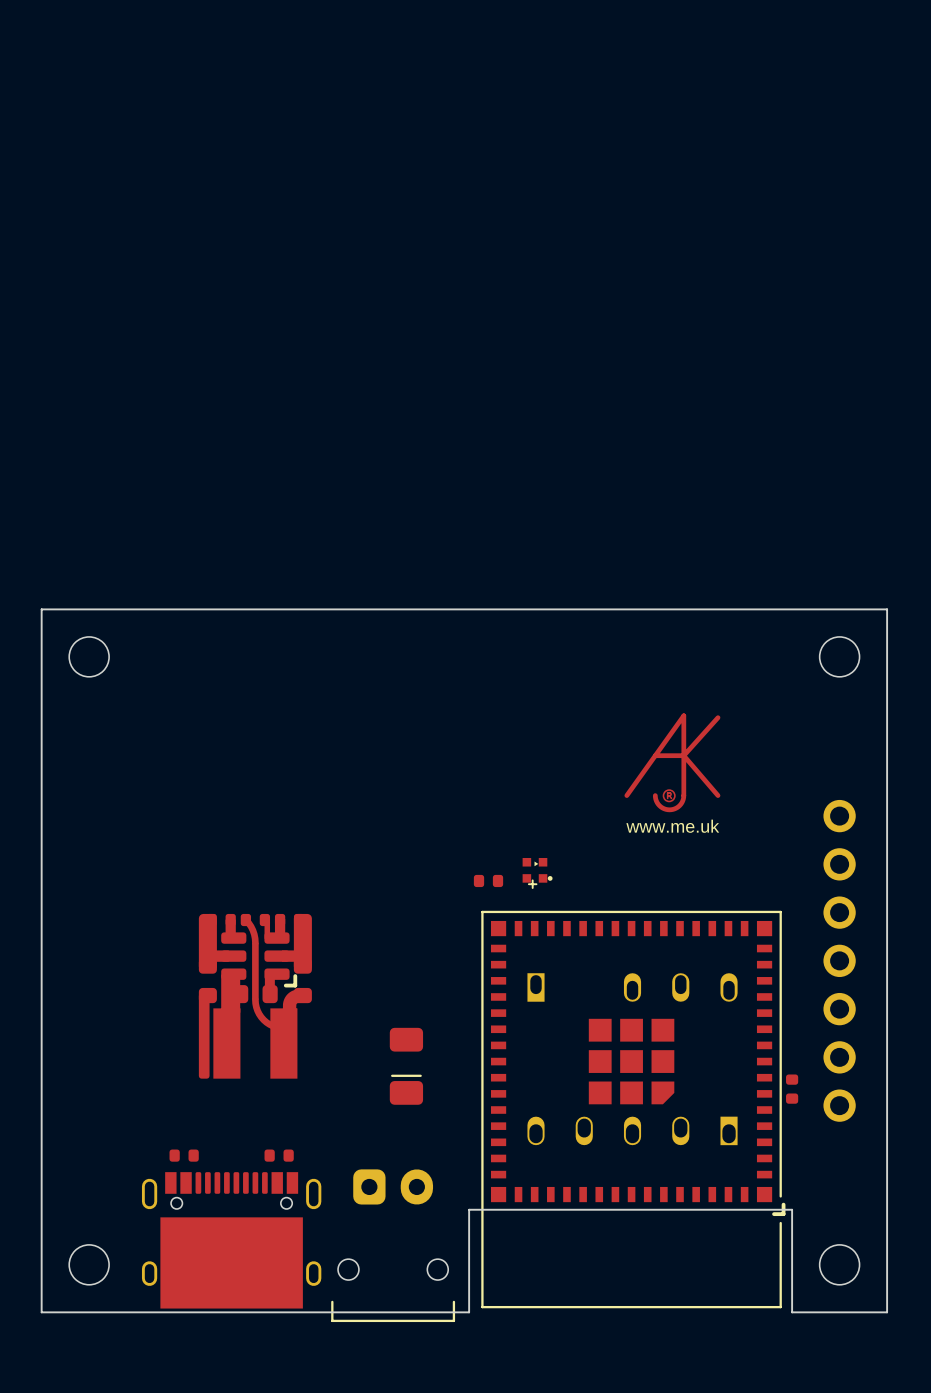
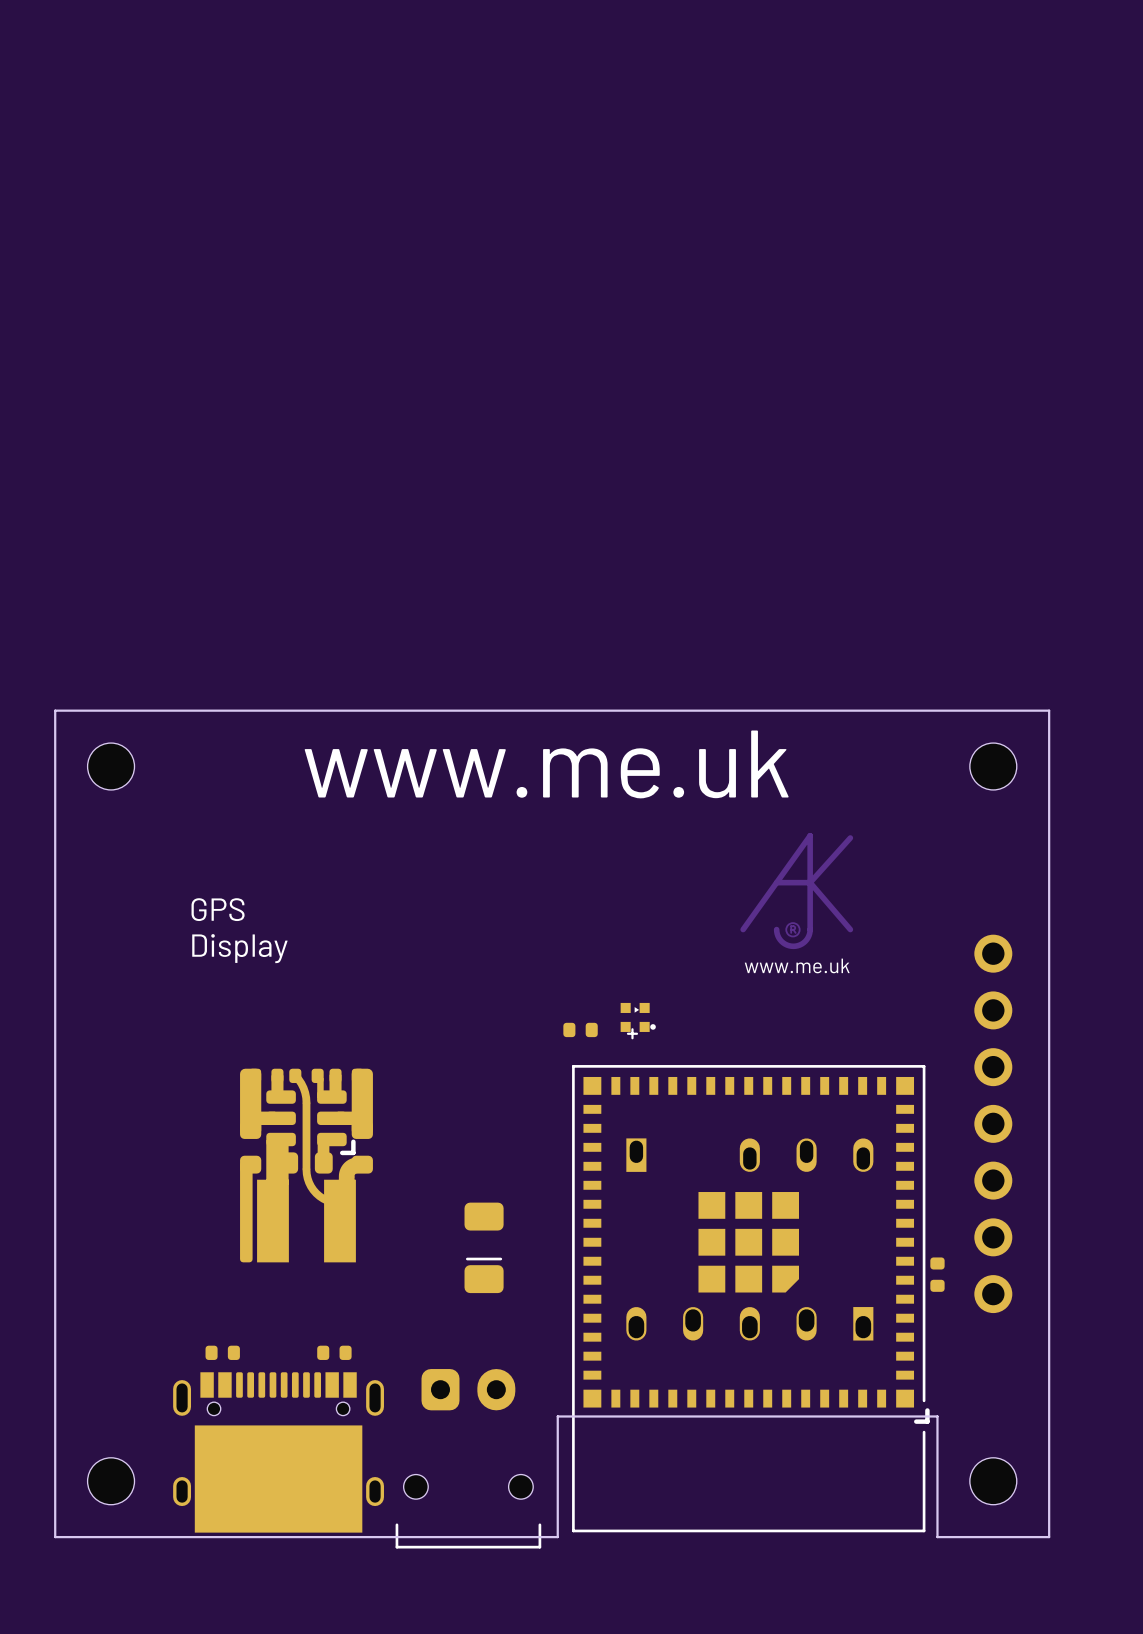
text: none -> www.me.uk (546, 764)
text: none -> GPS (218, 909)
text: none -> Display (239, 948)

